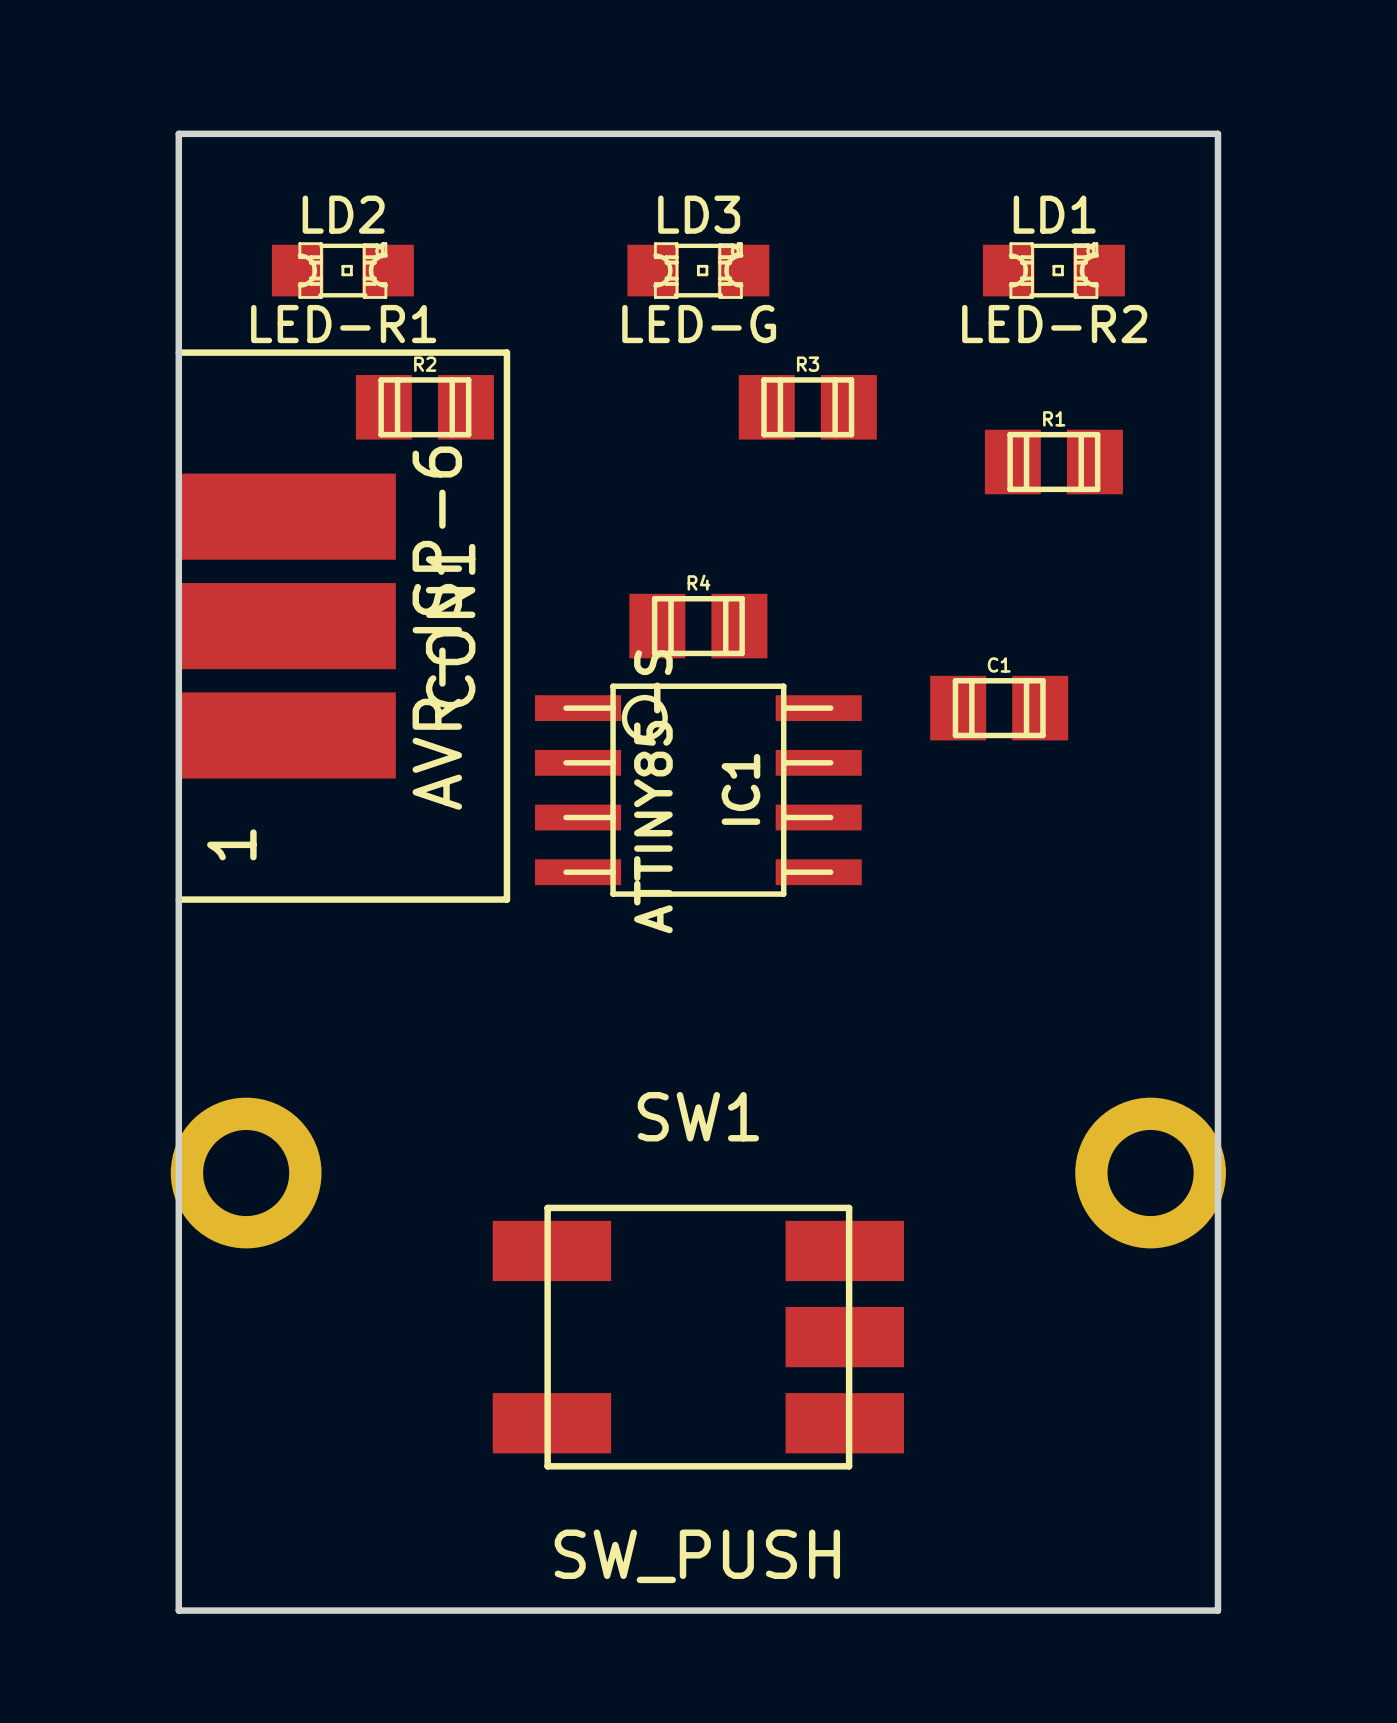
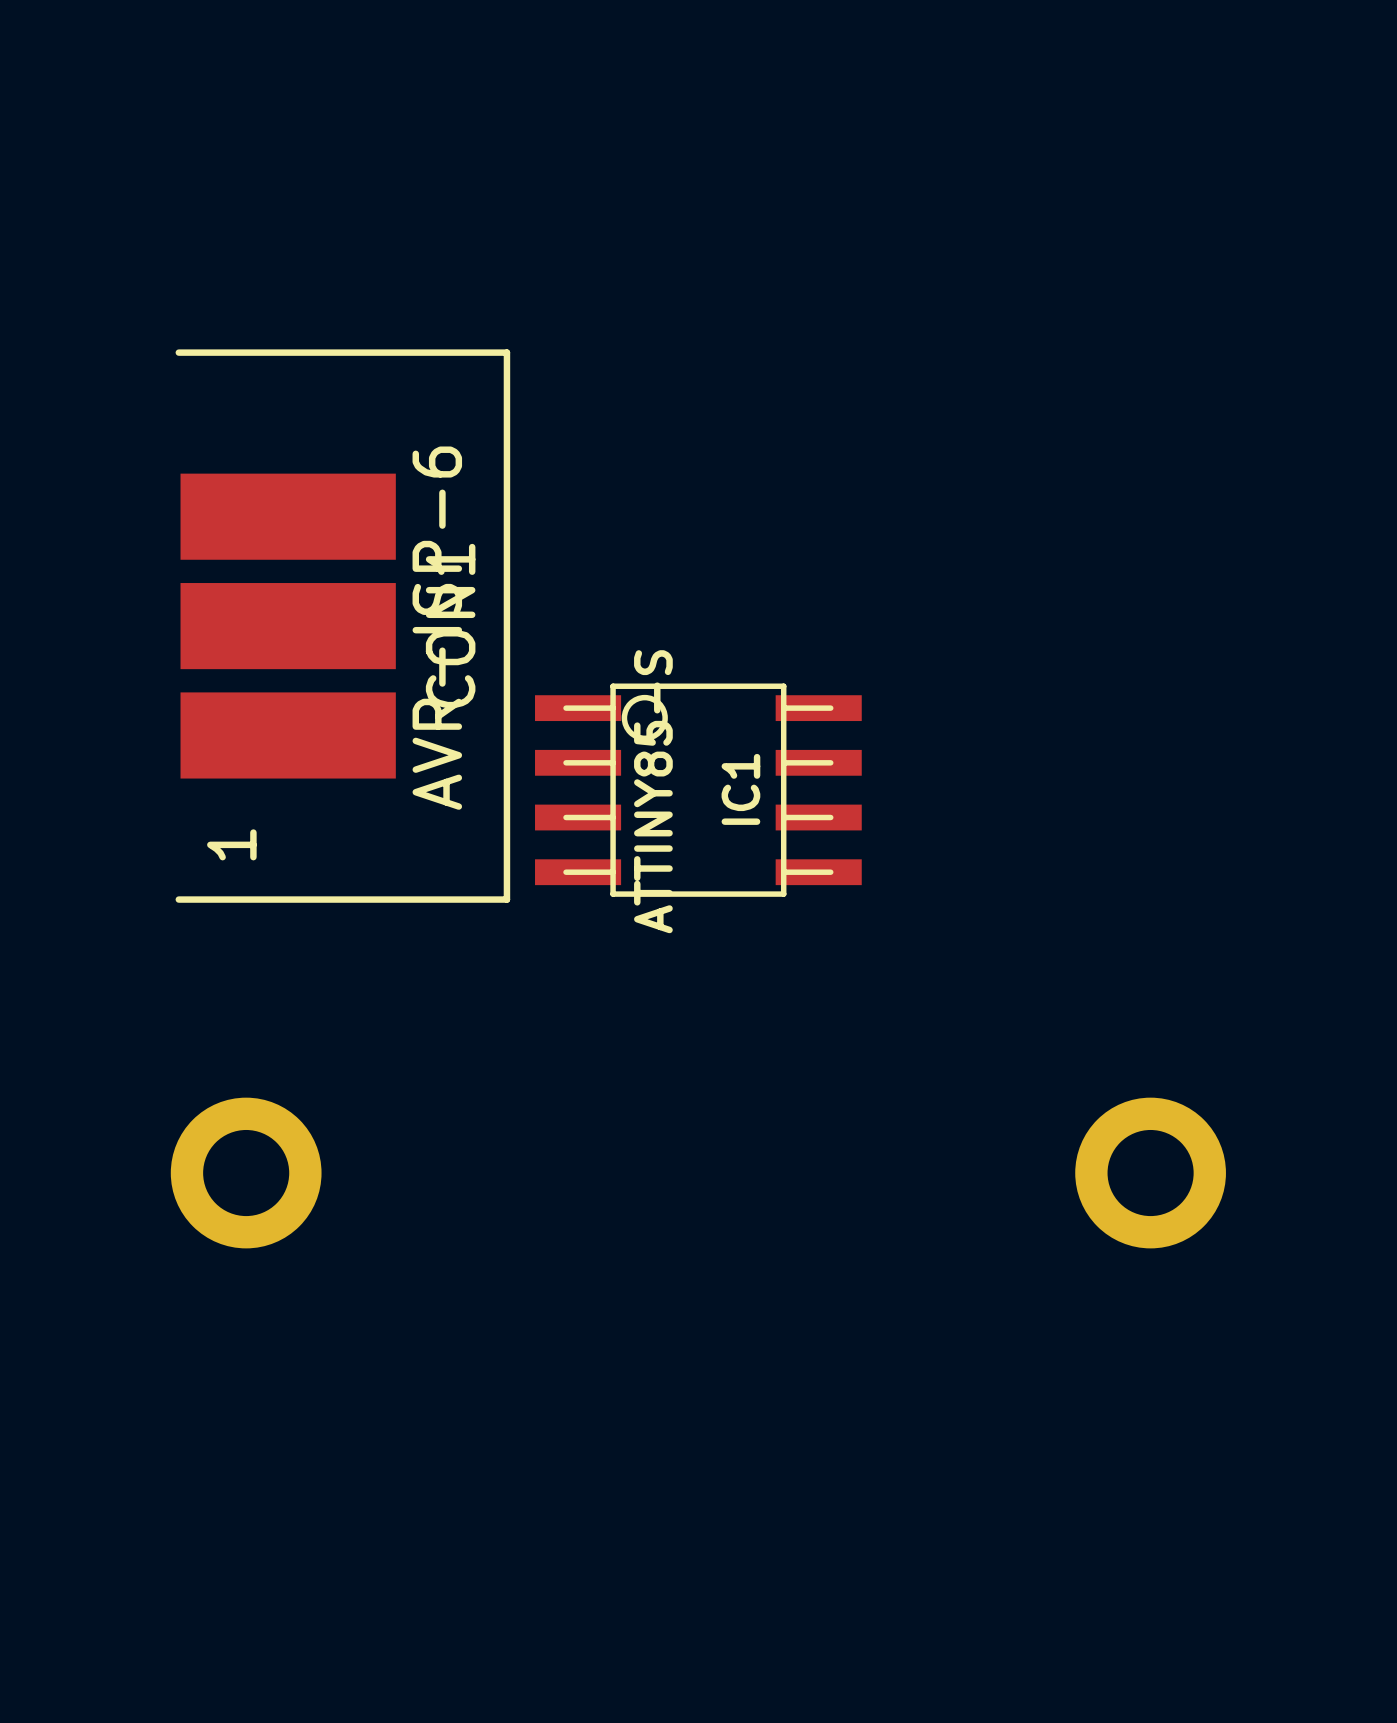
board edge: (178, 133) (178, 1610) (1217, 1610) (1217, 133) (178, 133) -> none
LD2: LED-R1 (342, 270) -> none
LD3: LED-G (698, 270) -> none
LD1: LED-R2 (1053, 270) -> none
R2: (424, 407) -> none
R3: (807, 407) -> none
R1: (1053, 462) -> none
R4: (698, 626) -> none
C1: (999, 708) -> none
SW1: SW_PUSH (698, 1337) -> none

